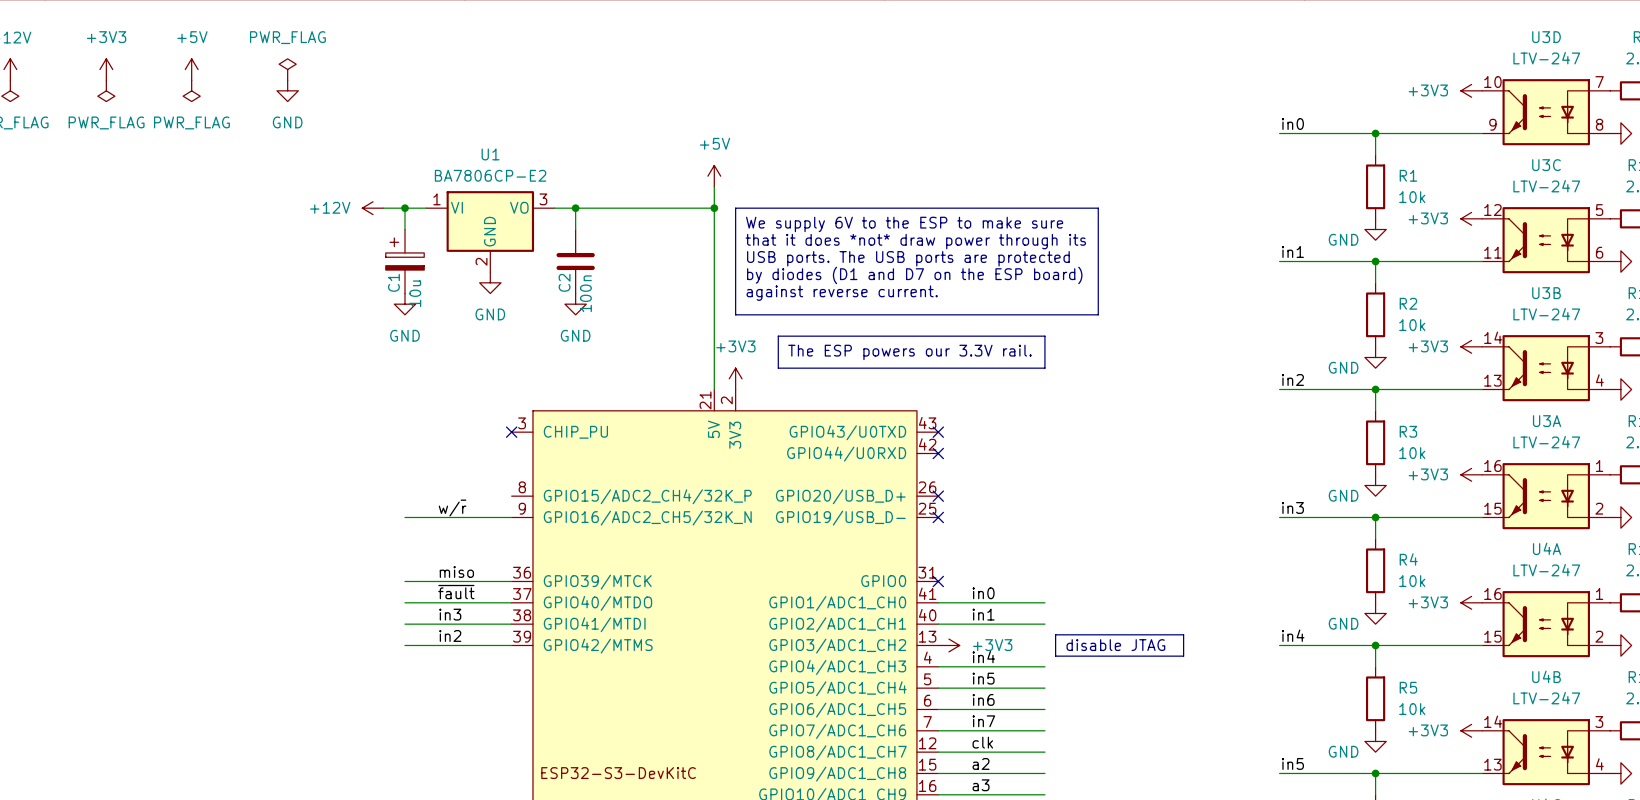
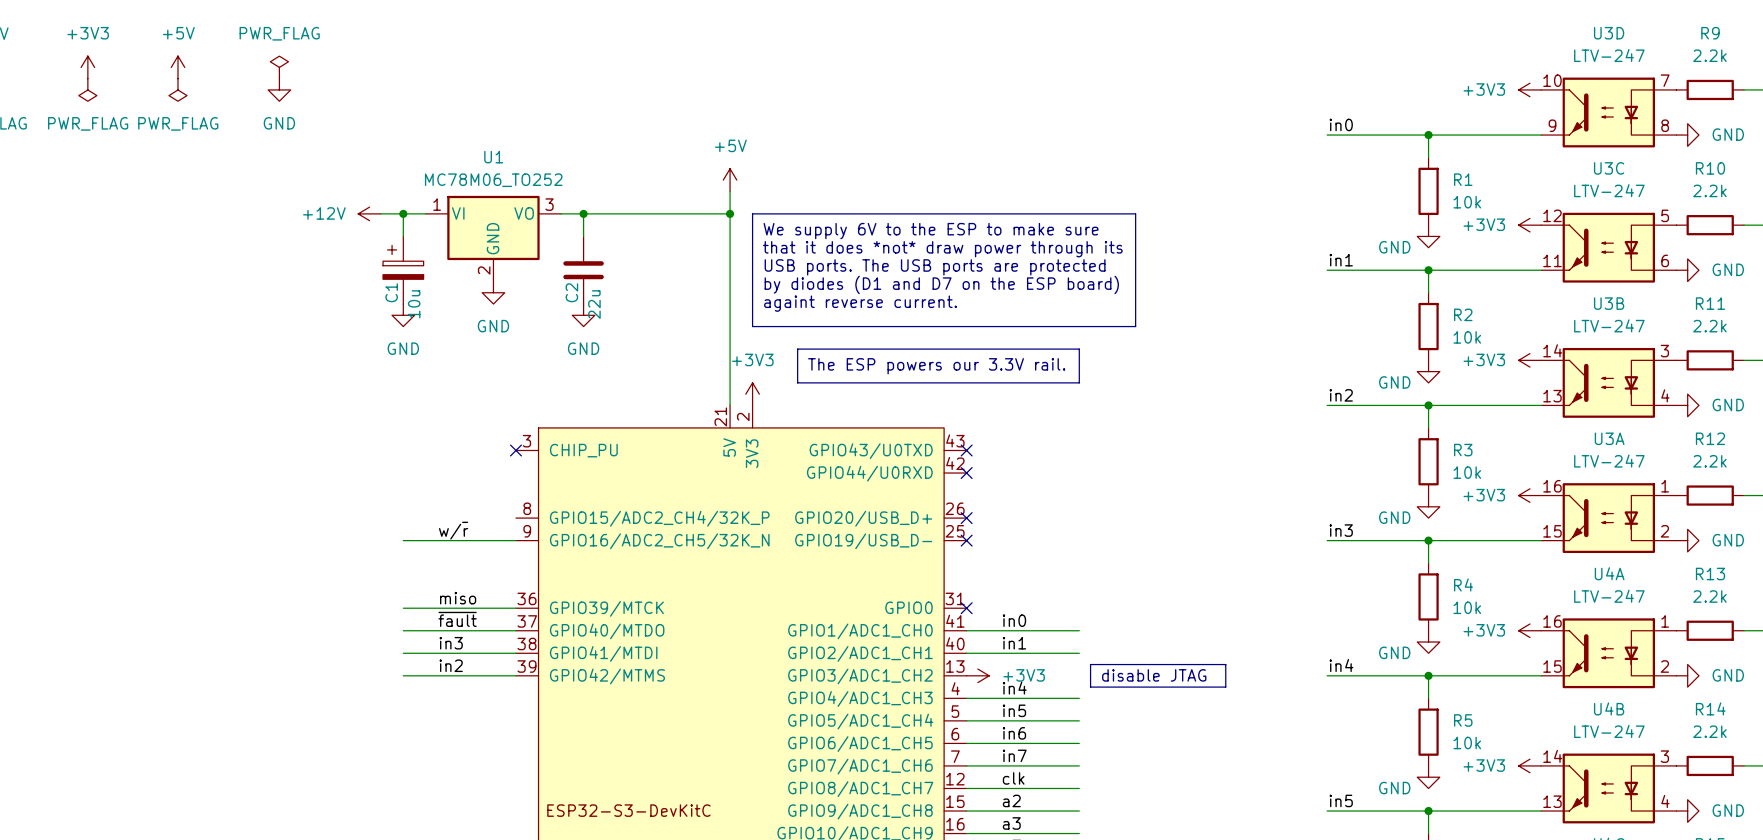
U1 value: BA7806CP-E2 (490, 175) -> MC78M06_TO252 (493, 180)
C2 value: 100n (585, 293) -> 22u (594, 304)
text: against reverse current. (842, 293) -> againt reverse current. (860, 303)

